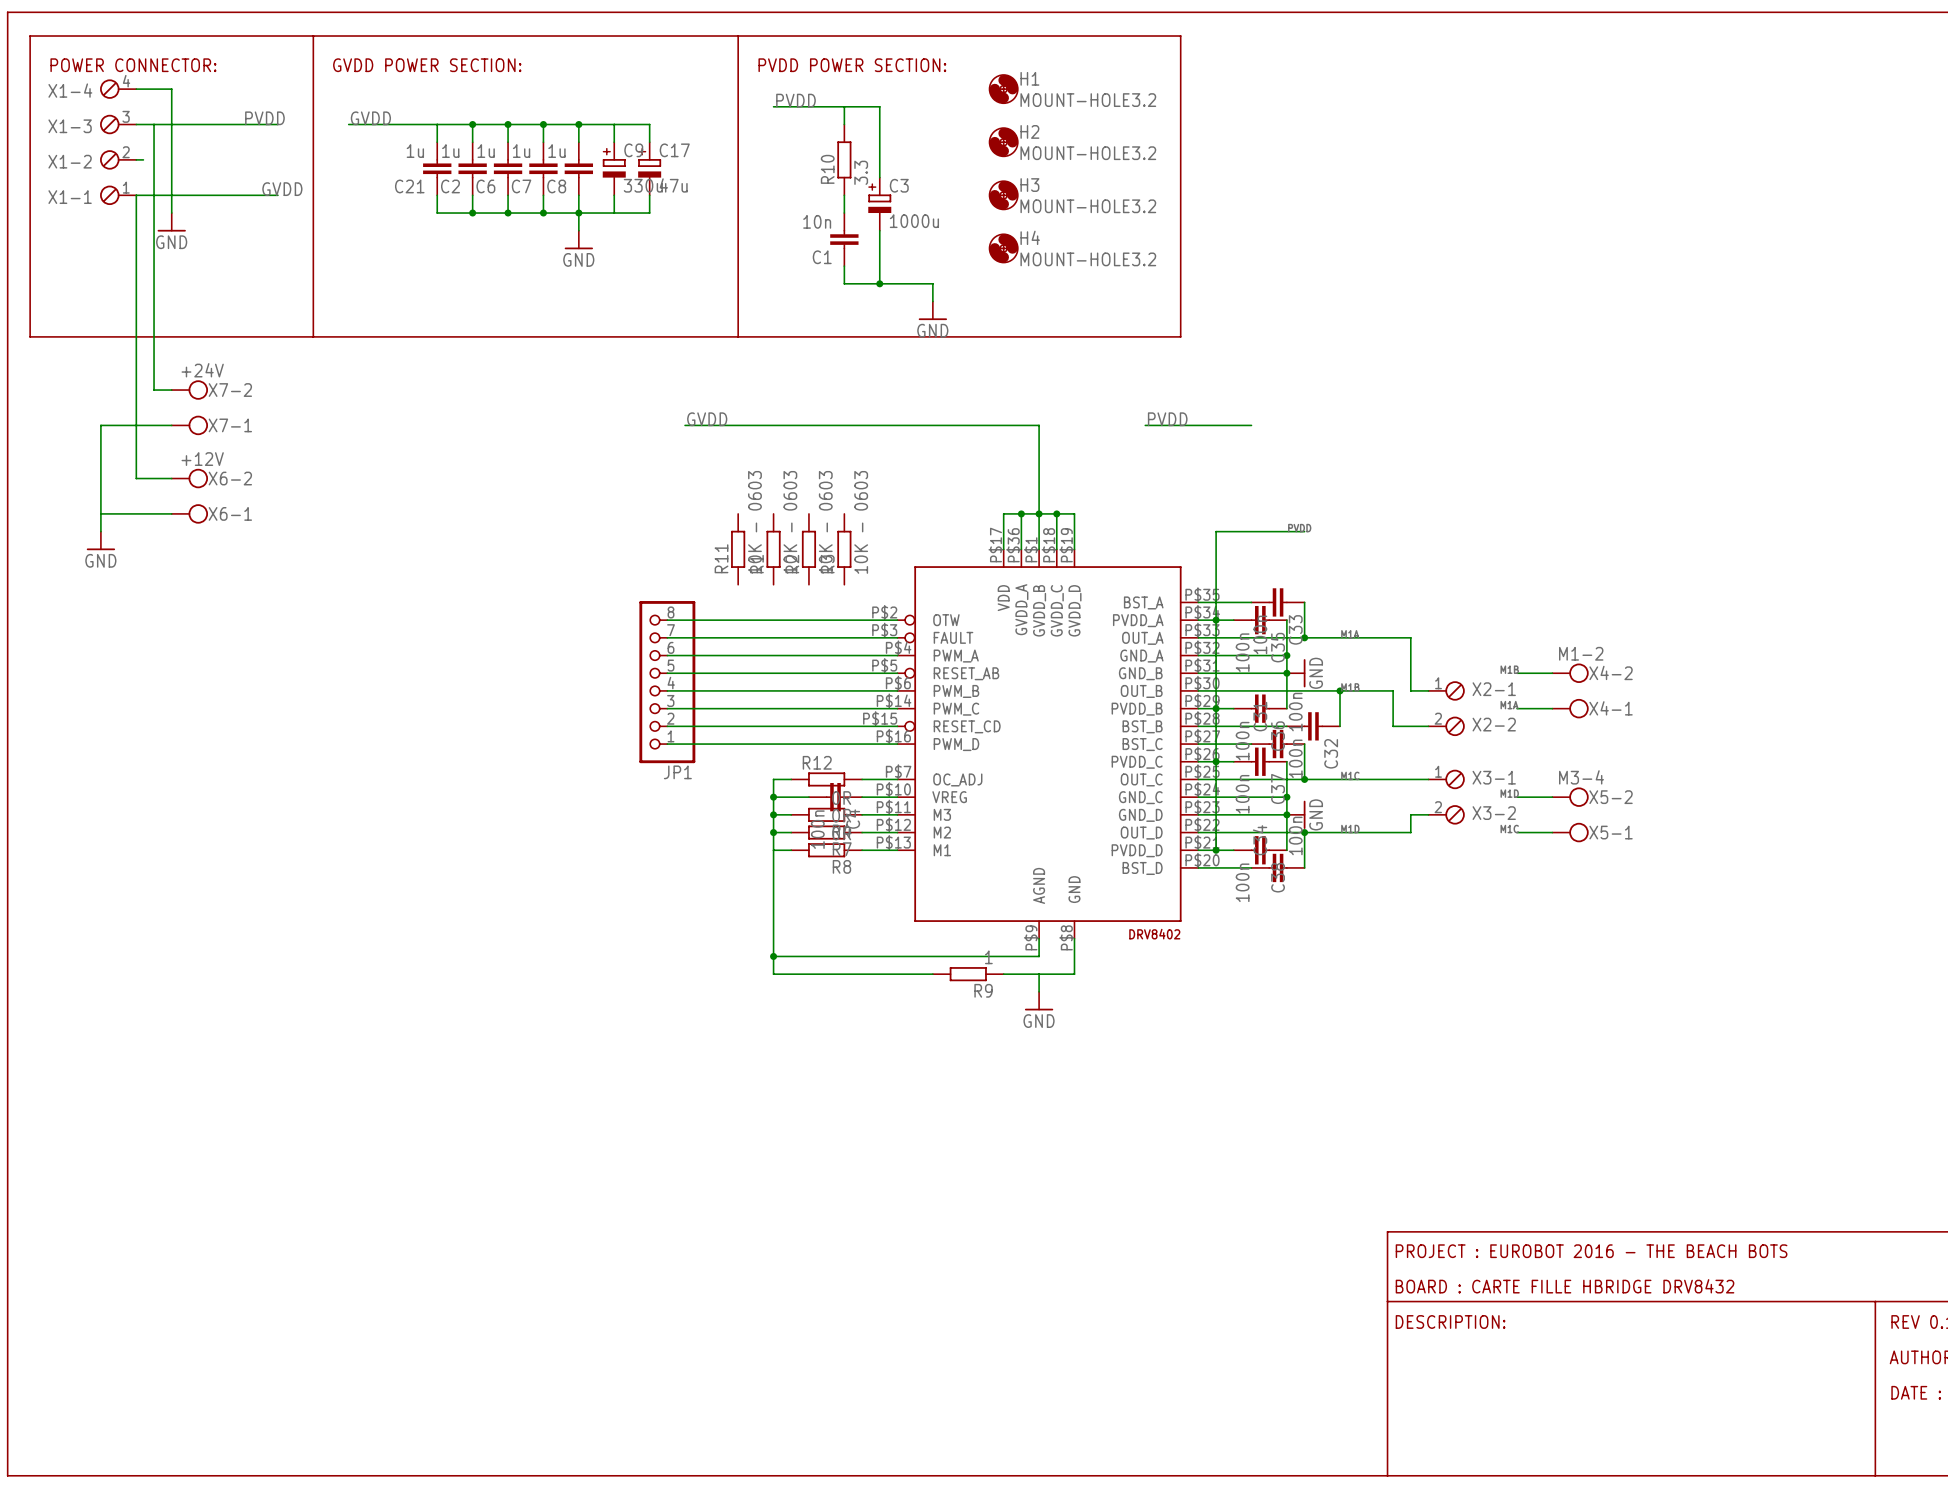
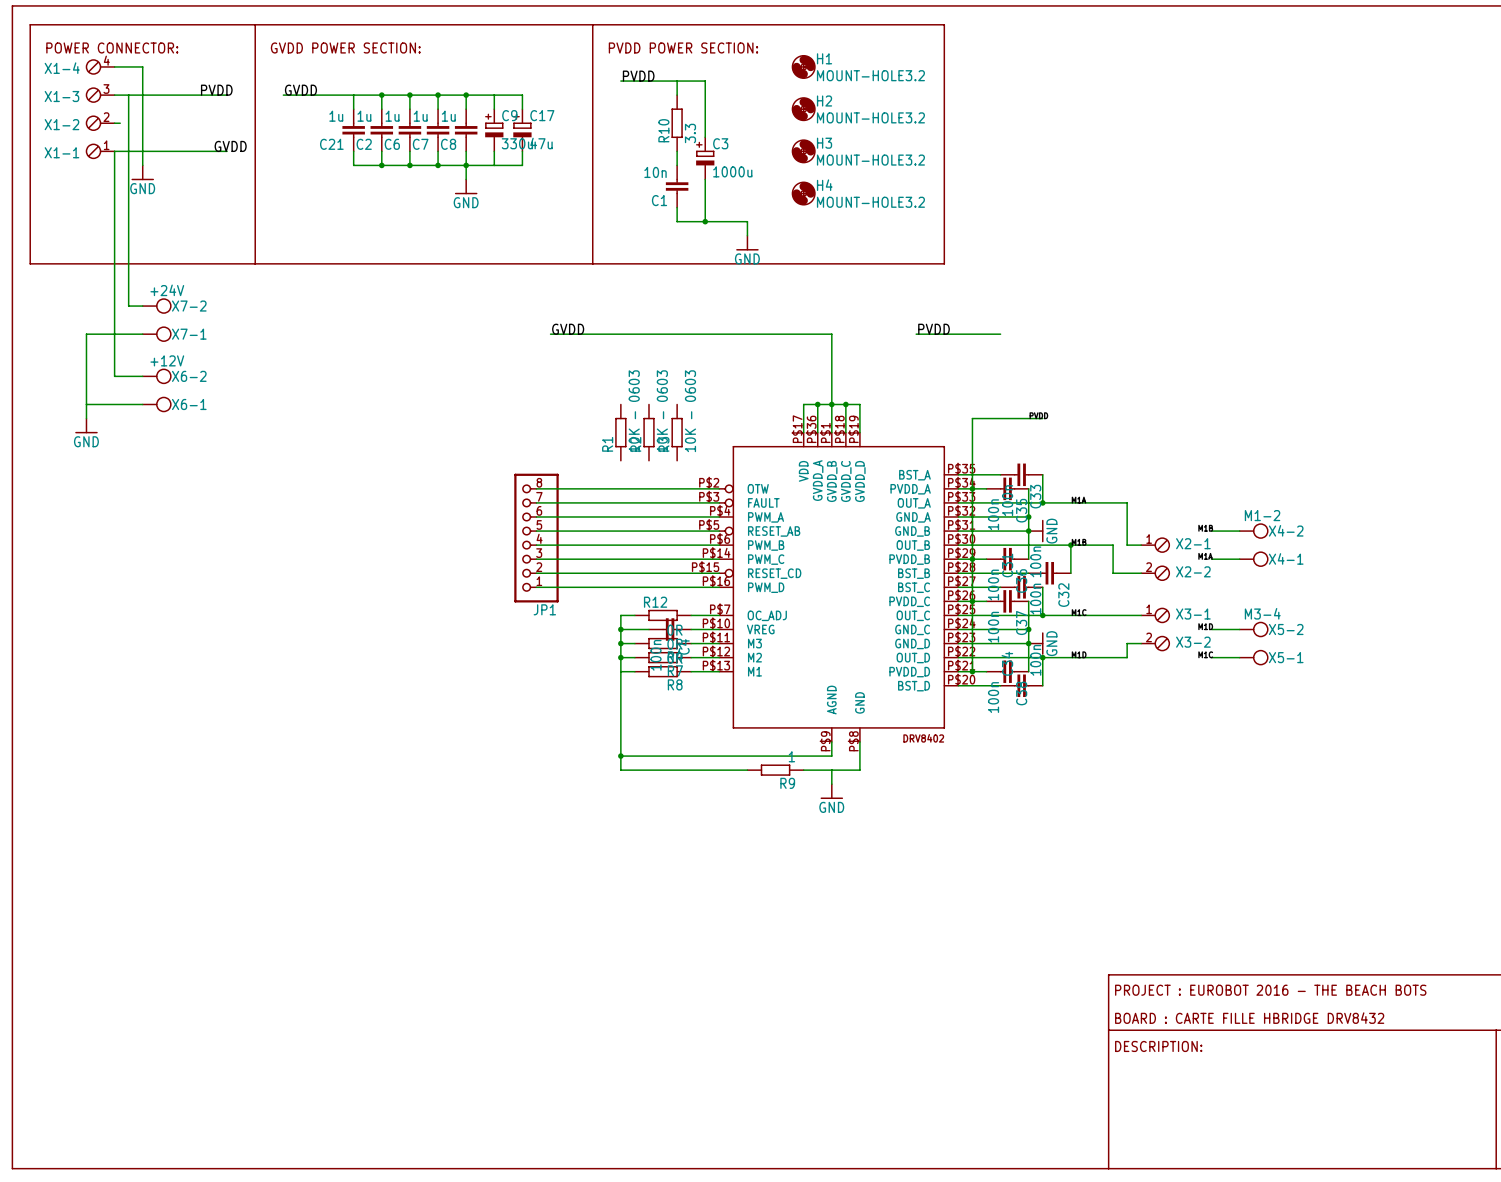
R11: 10K - 0603 (738, 549) -> none

